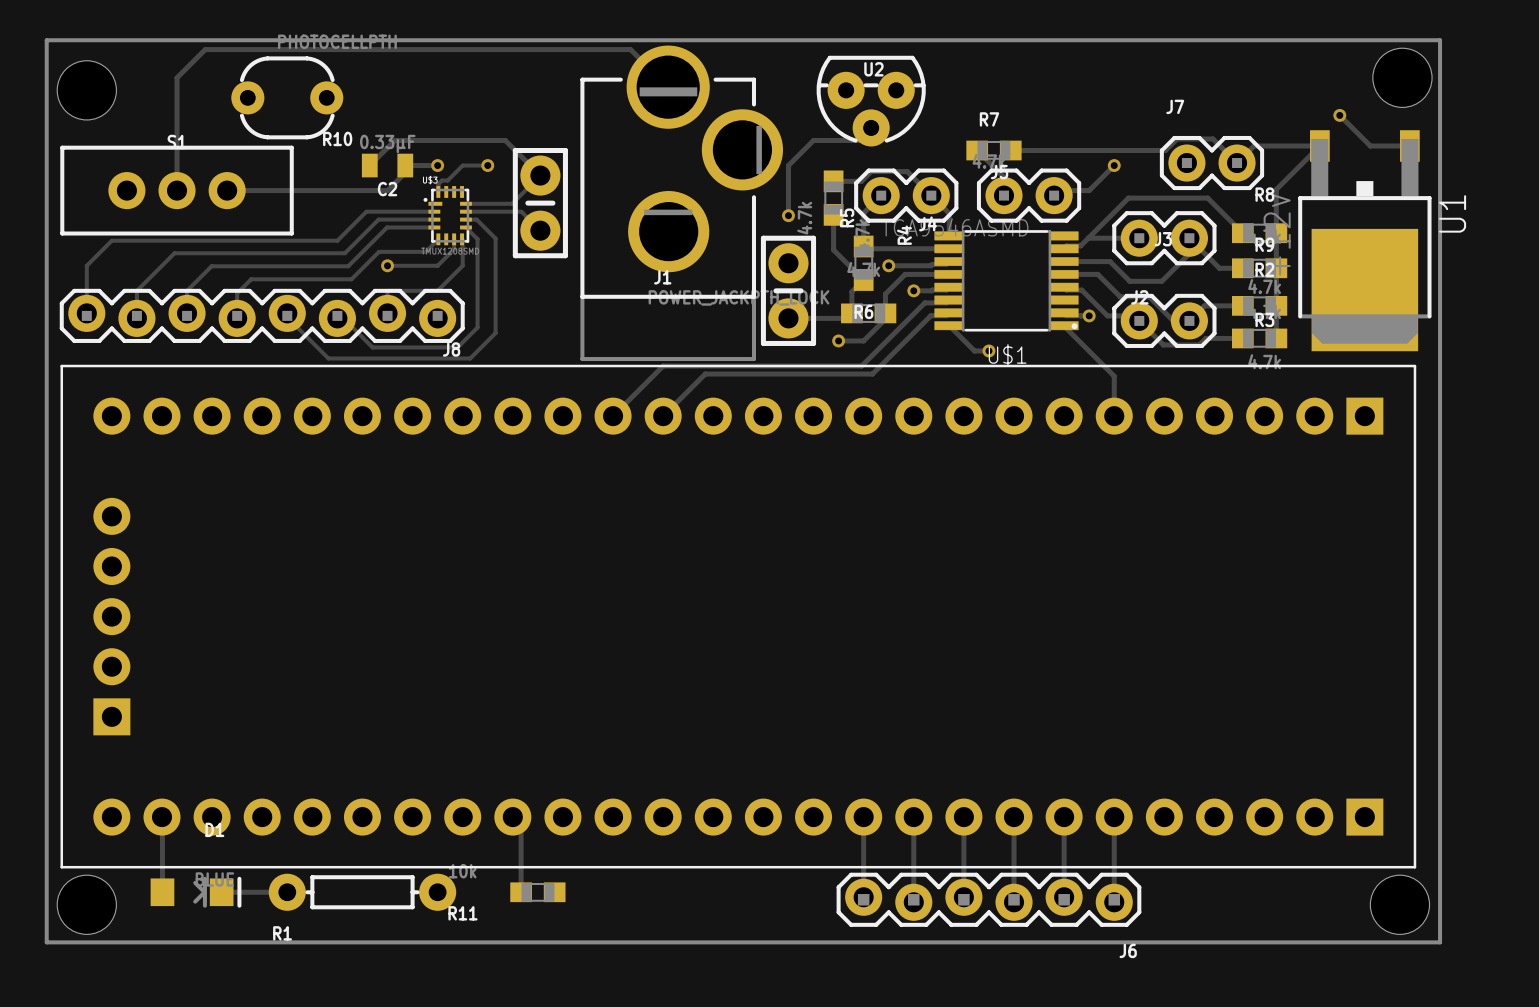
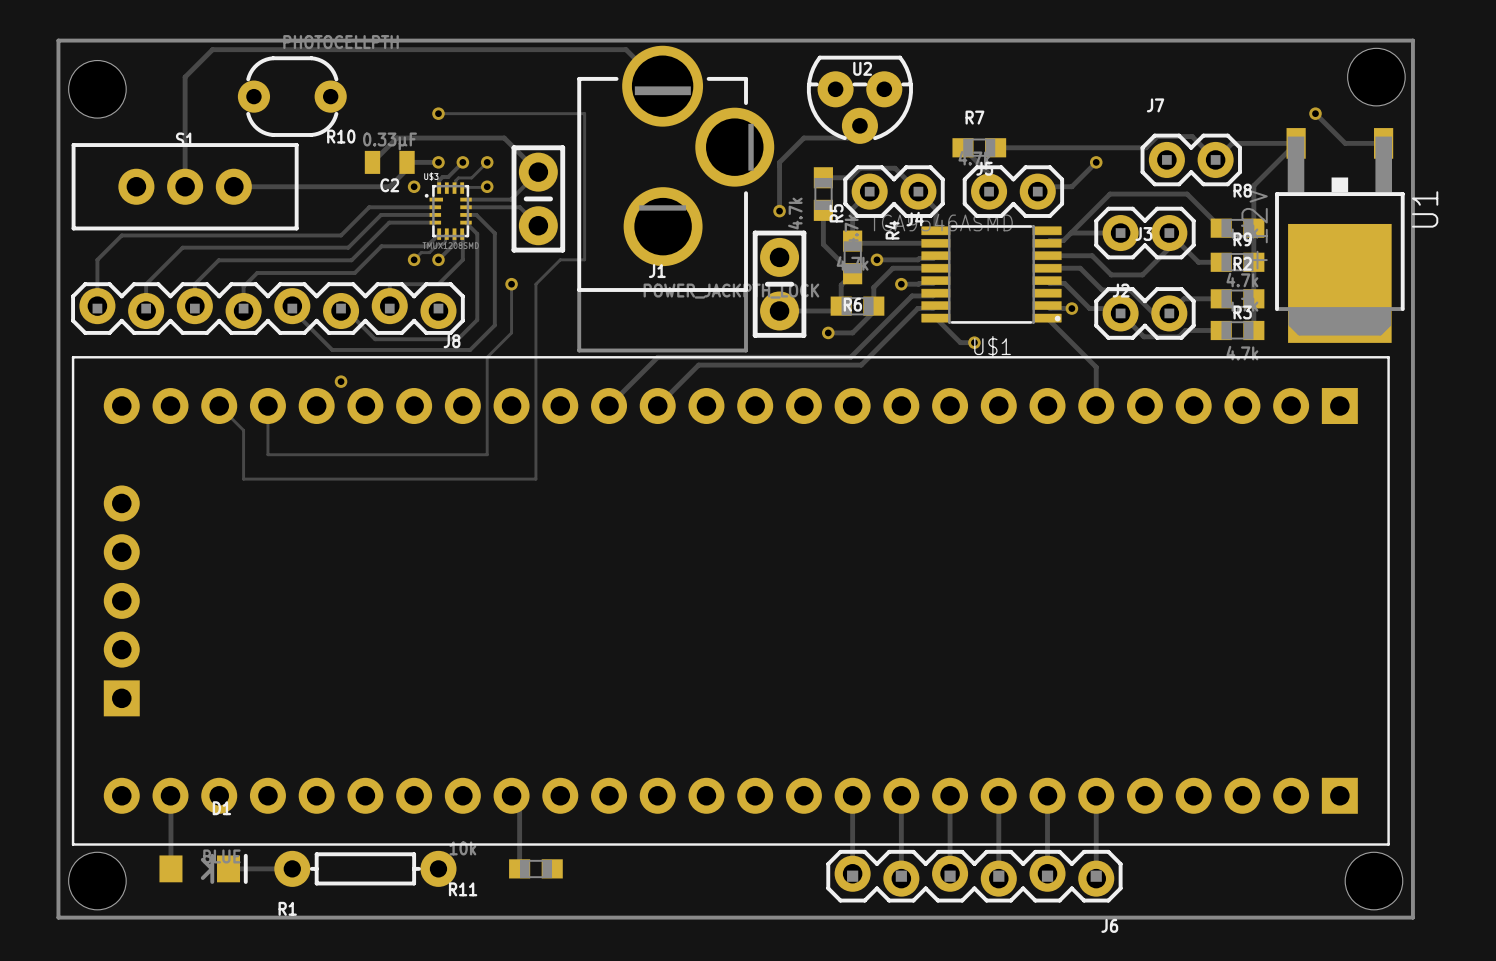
track: none -> (438, 113) (584, 113) (584, 259) (560, 259) (535, 284) (535, 479) (243, 479) (243, 430) (219, 406)
via: none -> (438, 113)
track: (462, 165) (487, 165) -> (454, 188) (458, 177) (471, 177) (487, 162)
via: none -> (462, 162)
via: none -> (414, 186)
track: none -> (487, 186) (462, 188)
via: none -> (487, 186)
track: none -> (446, 234) (442, 244) (437, 244) (429, 252) (421, 252) (414, 259)
track: (387, 265) (437, 265) -> none
via: (387, 265) -> none
via: none -> (414, 259)
via: none -> (438, 259)
track: none -> (511, 284) (511, 332) (487, 357) (487, 454) (267, 454) (267, 406)
via: none -> (511, 284)
via: none -> (341, 381)

